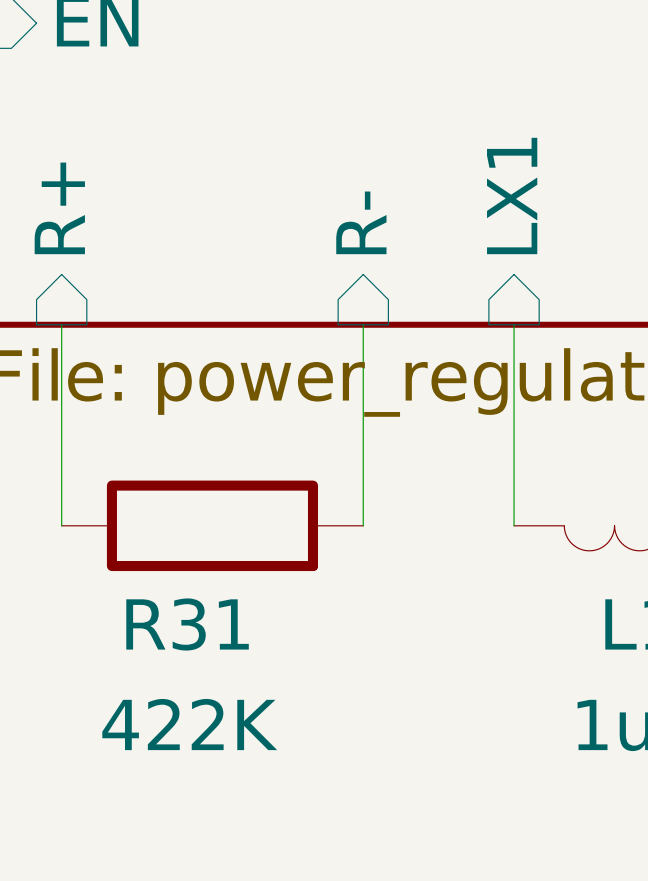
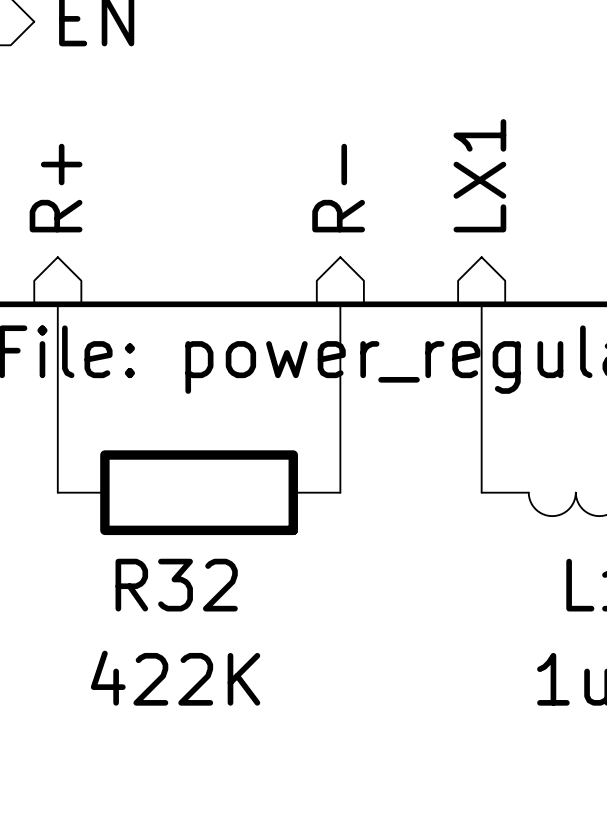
R31 name: R31 (187, 624) -> R32 (176, 585)

